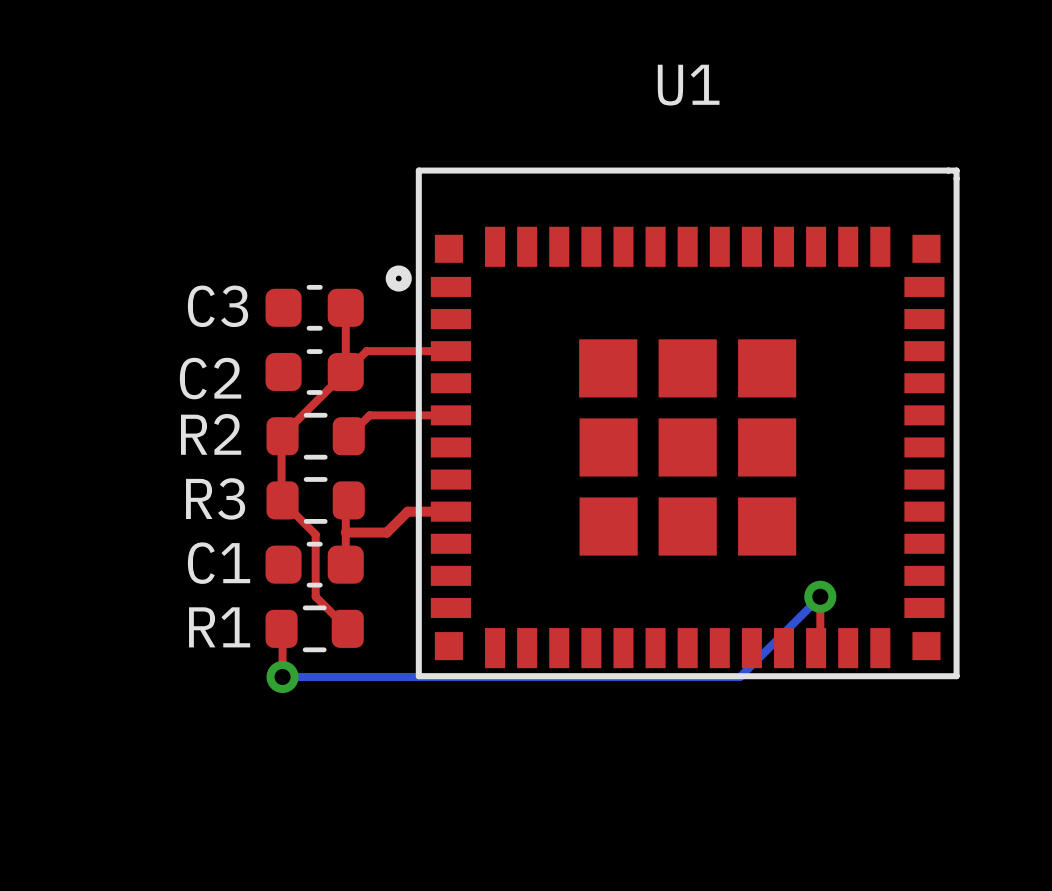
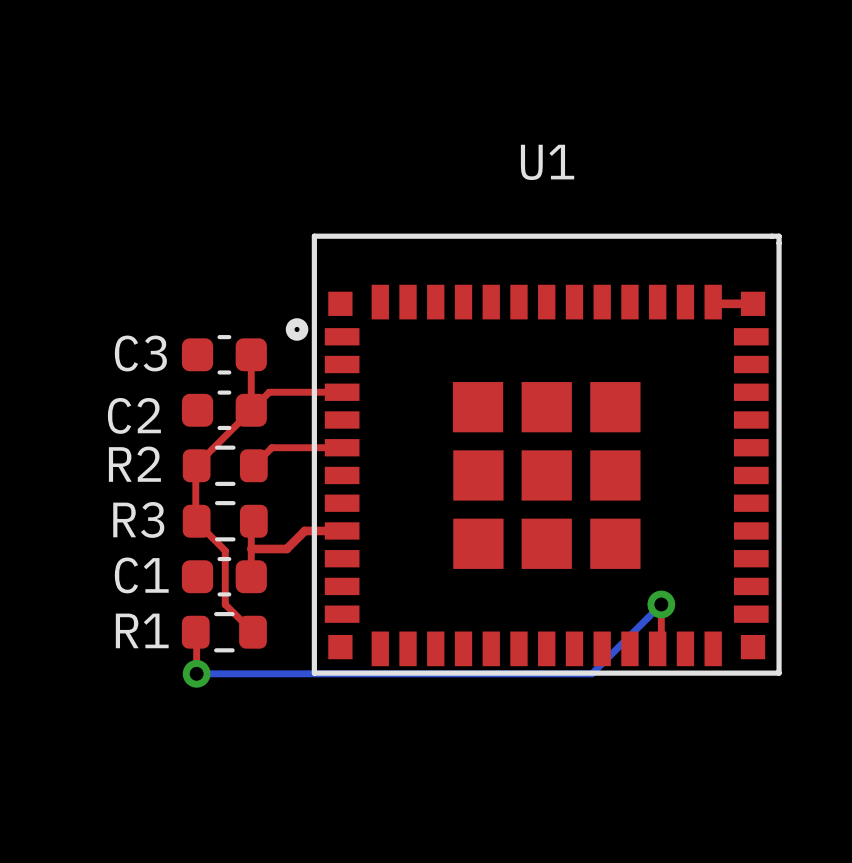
top track: none -> (718, 303) (753, 303)

